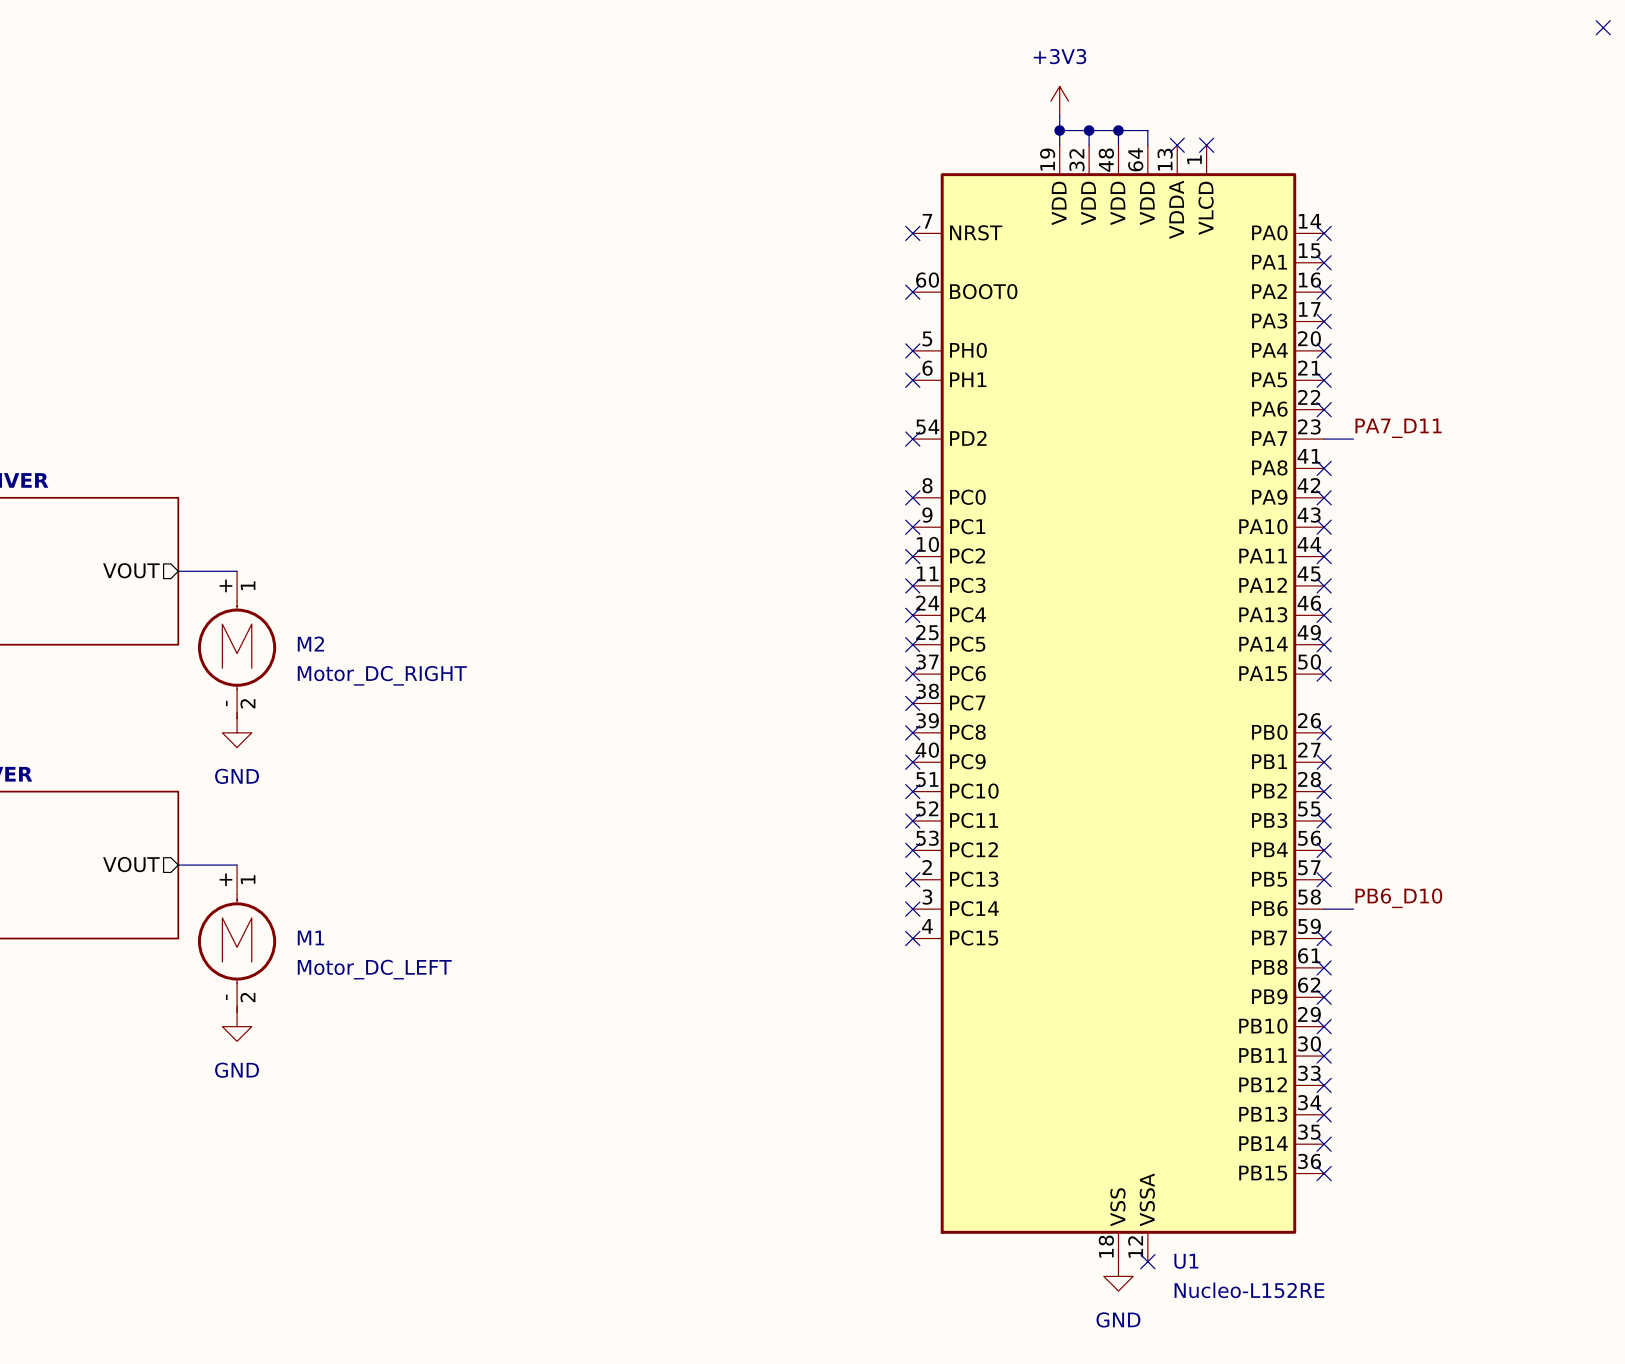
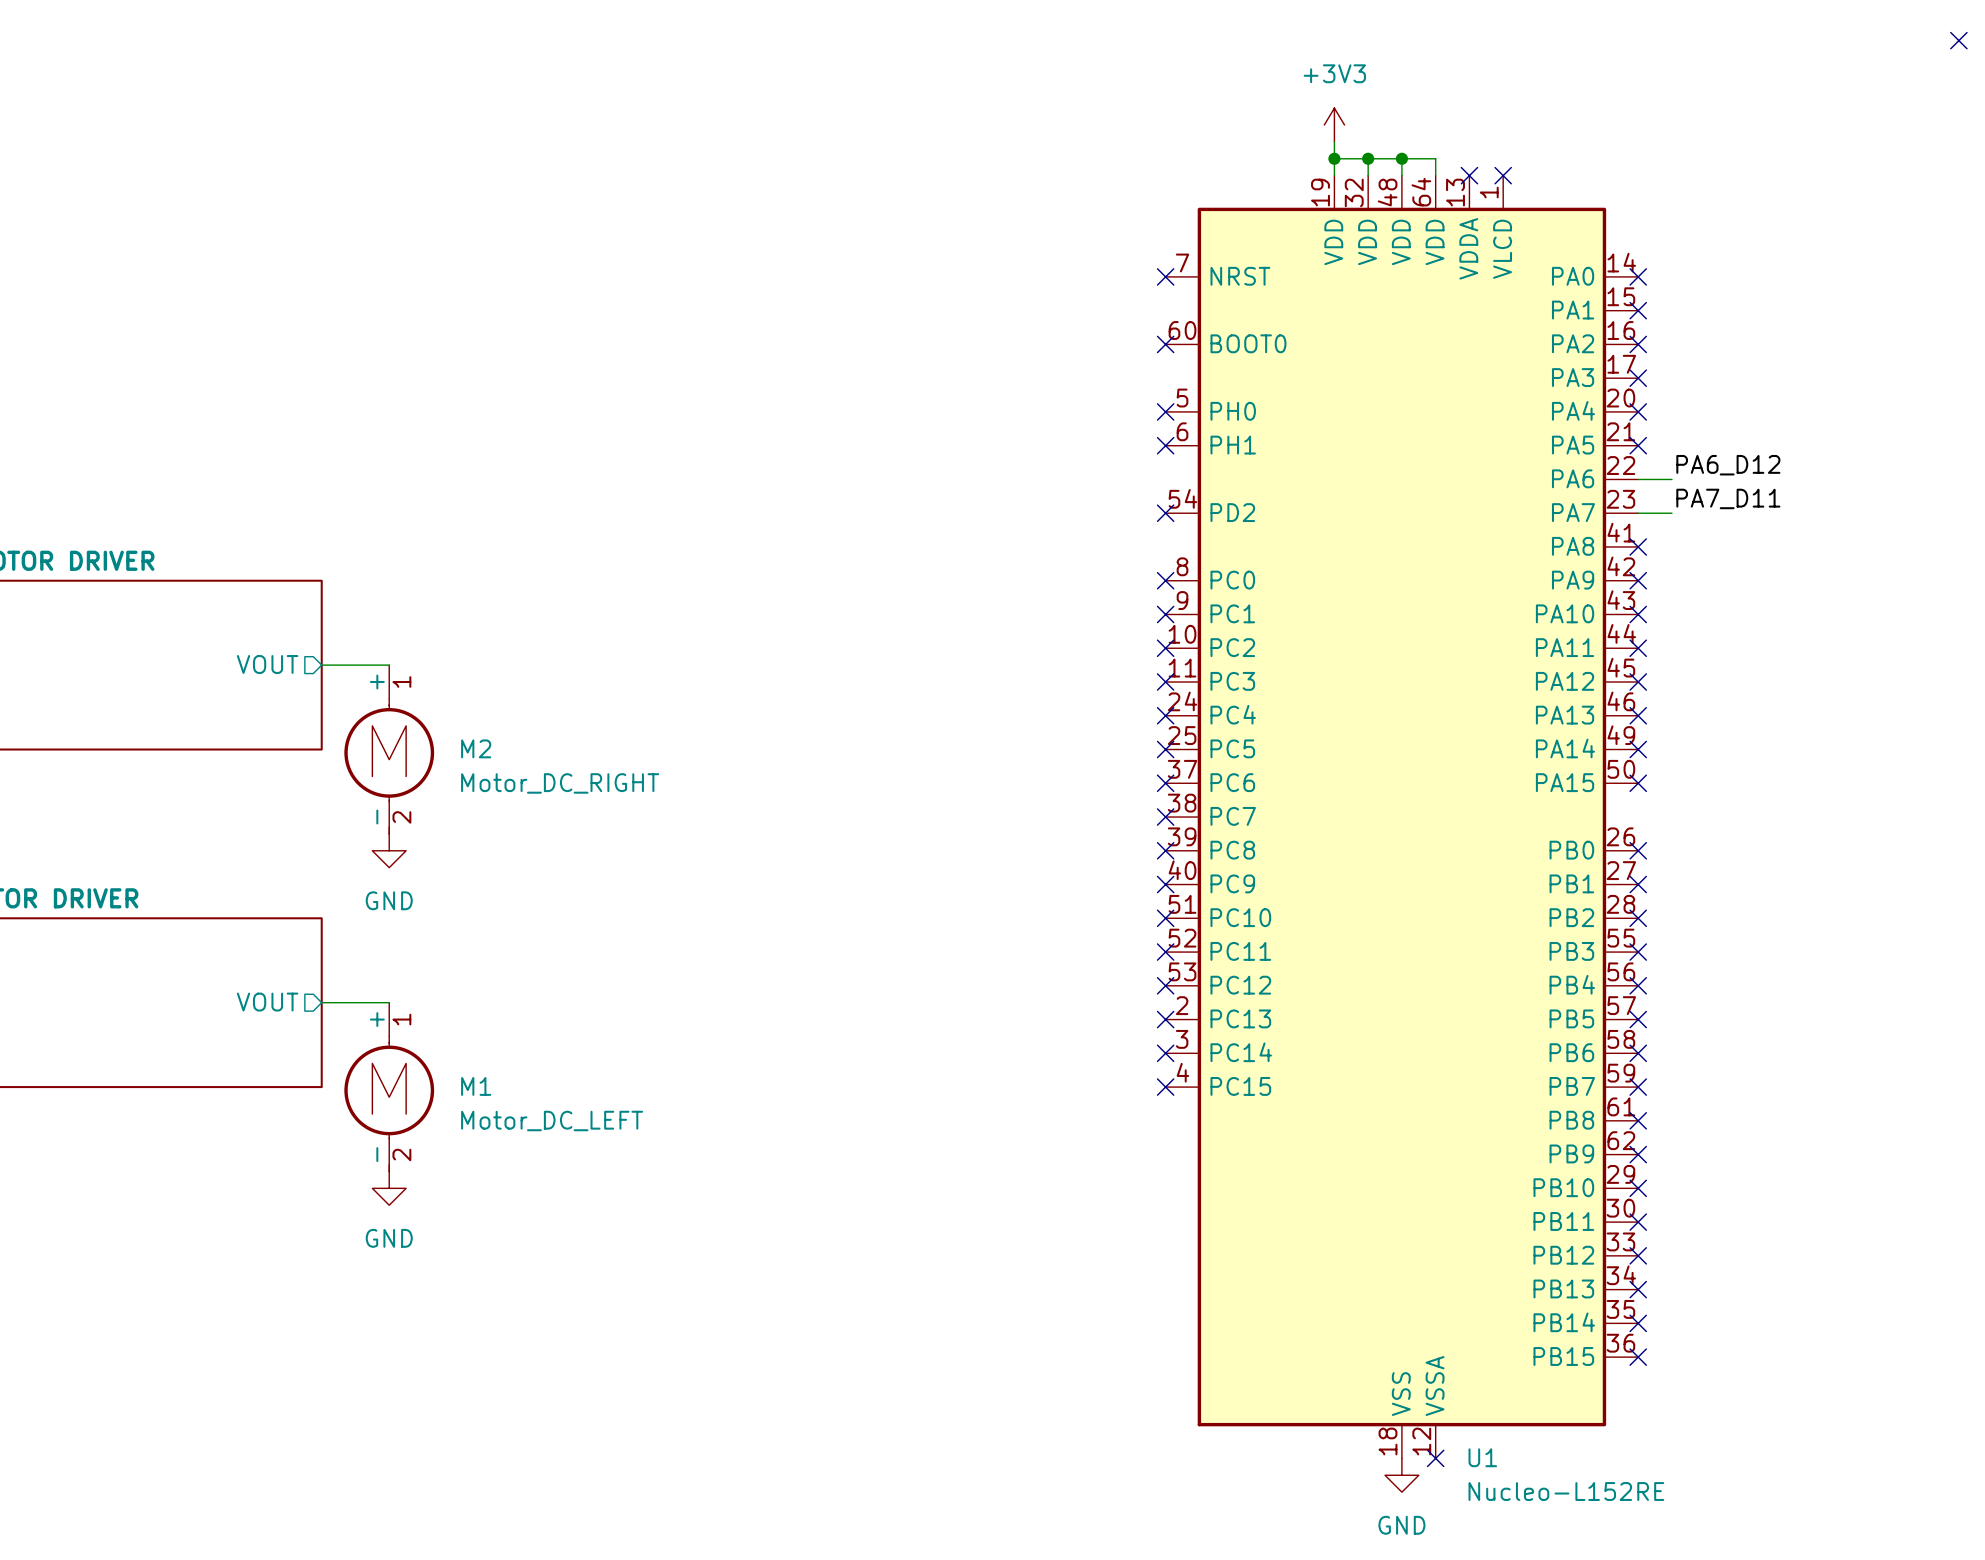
label: none -> PA6_D12 (1728, 465)
wire: none -> (1638, 479) (1671, 479)
no-connect mark: (1324, 409) -> none
label: PB6_D10 (1398, 898) -> none
wire: (1324, 909) (1353, 909) -> none
no-connect mark: none -> (1638, 1053)

